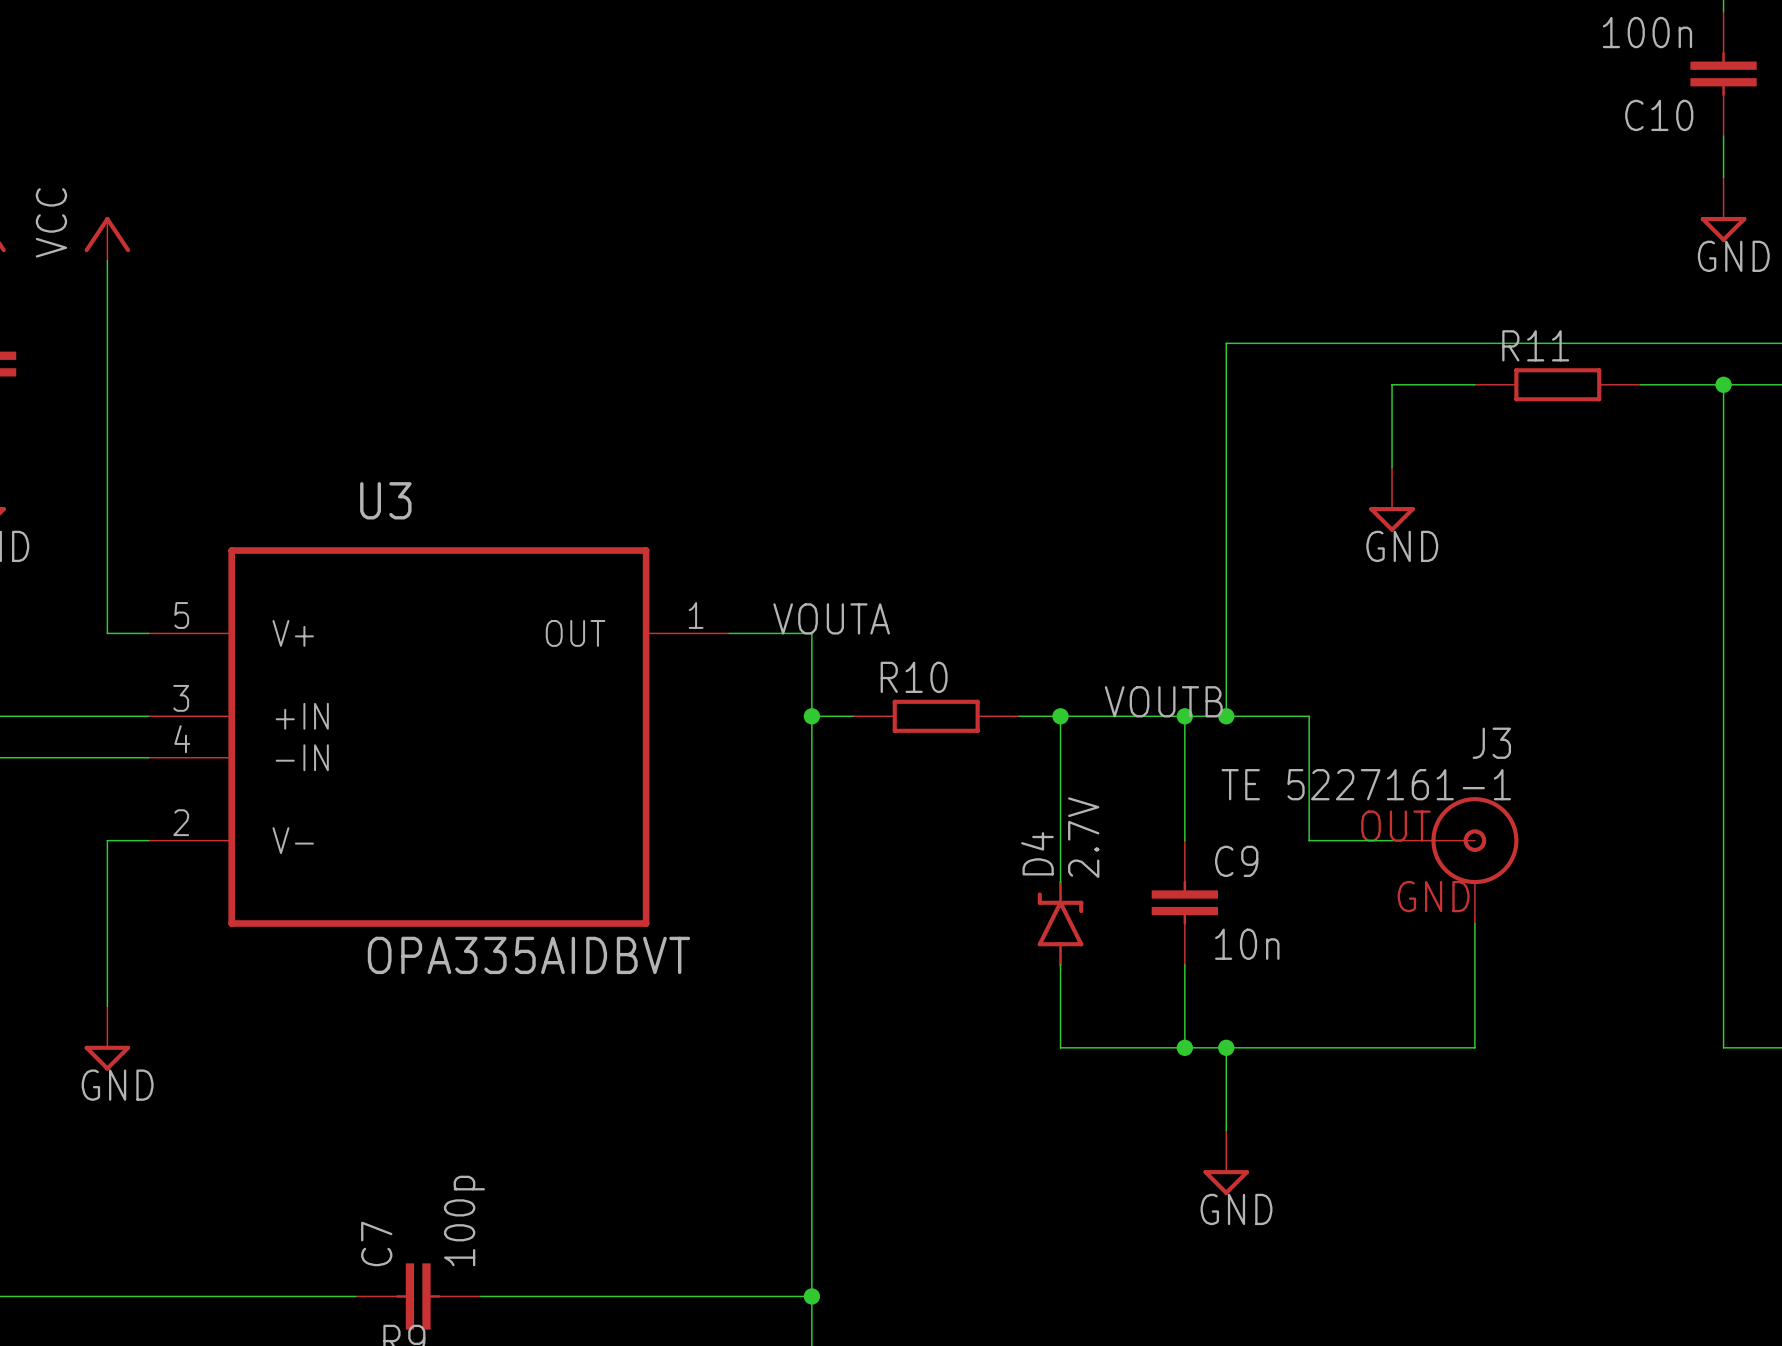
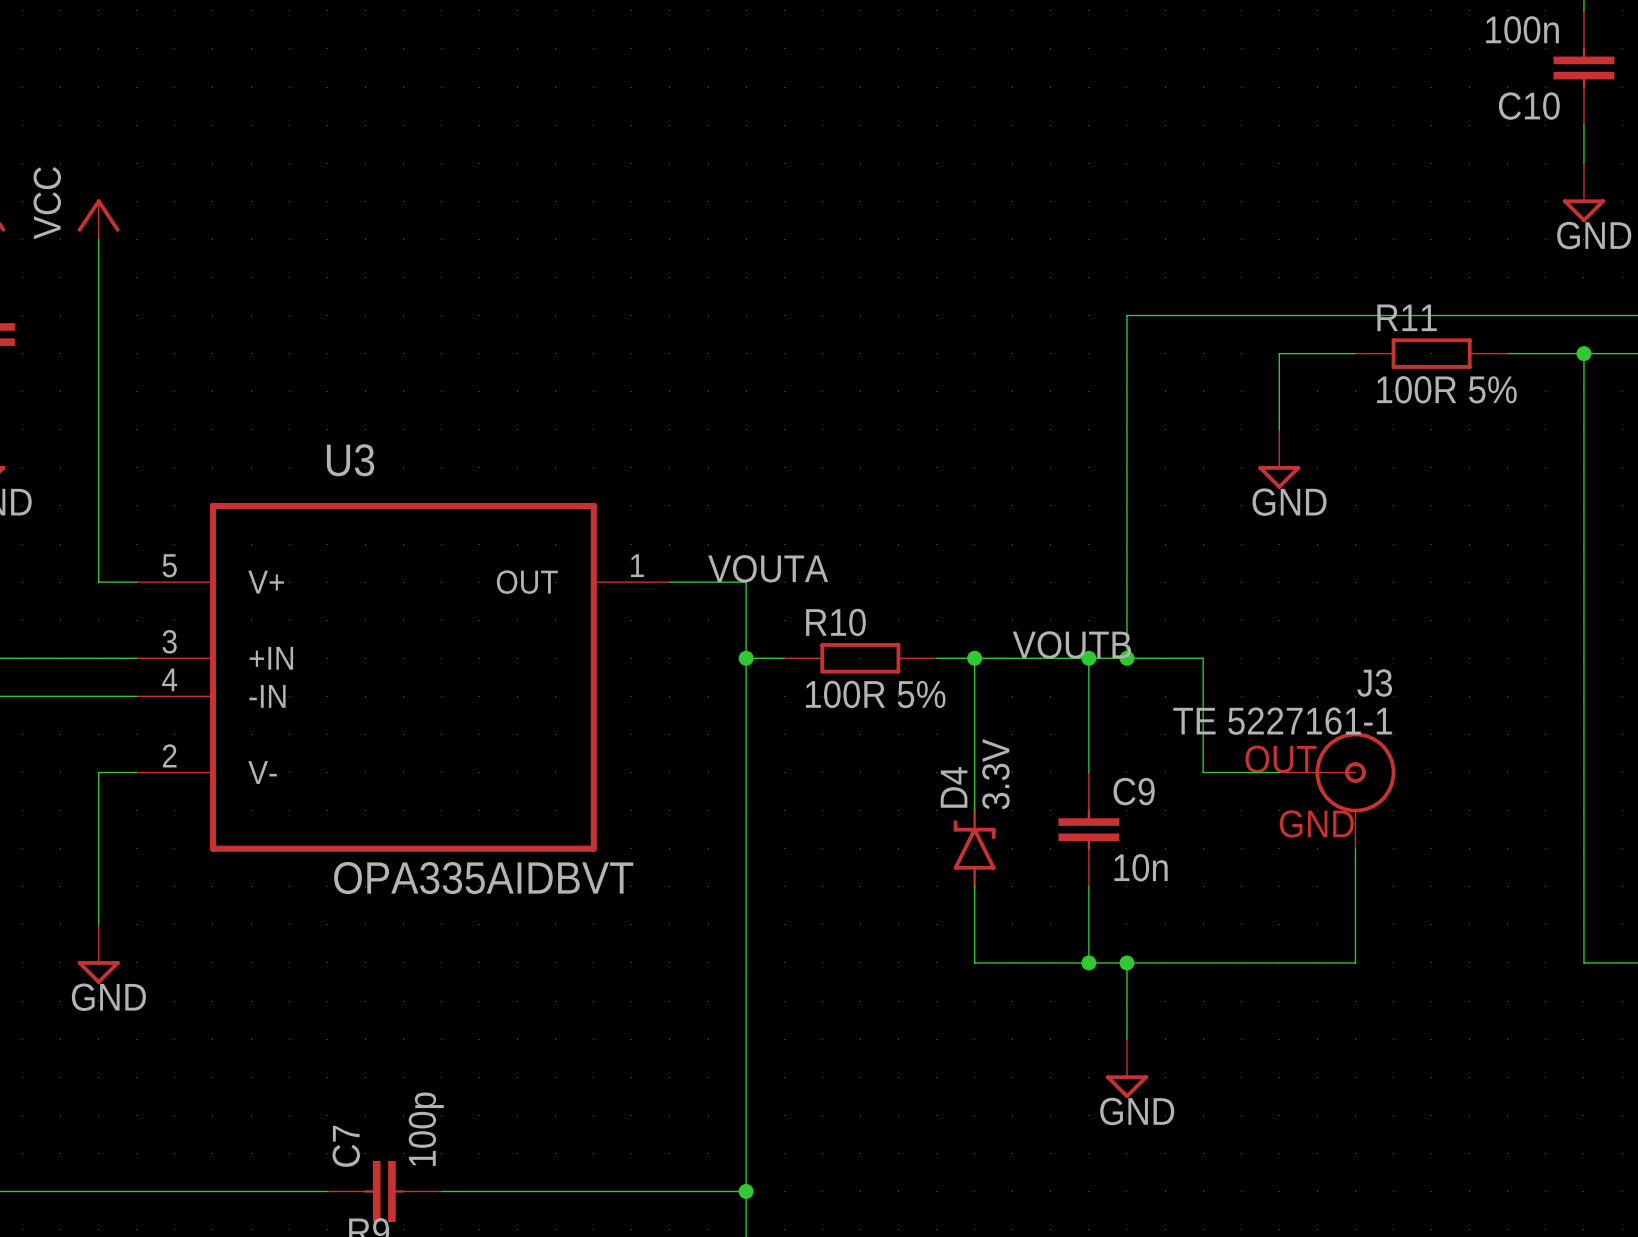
R11 value: none -> 100R 5% (1446, 389)
R10 value: none -> 100R 5% (875, 694)
D4 value: 2.7V (1083, 837) -> 3.3V (995, 774)

